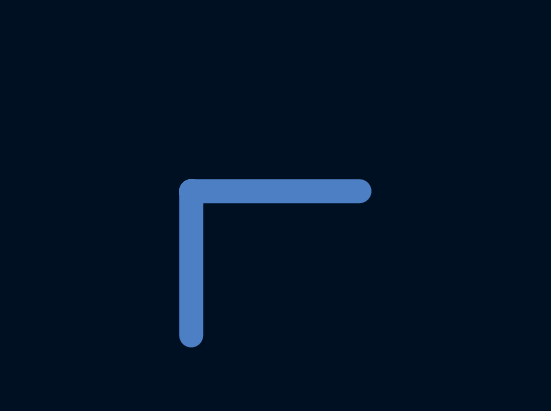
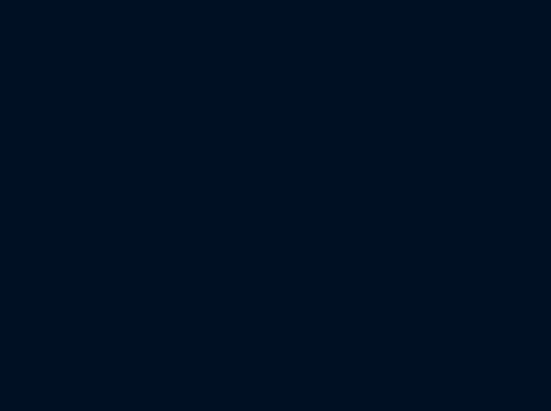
track: (359, 191) (191, 191) (191, 335) -> none

